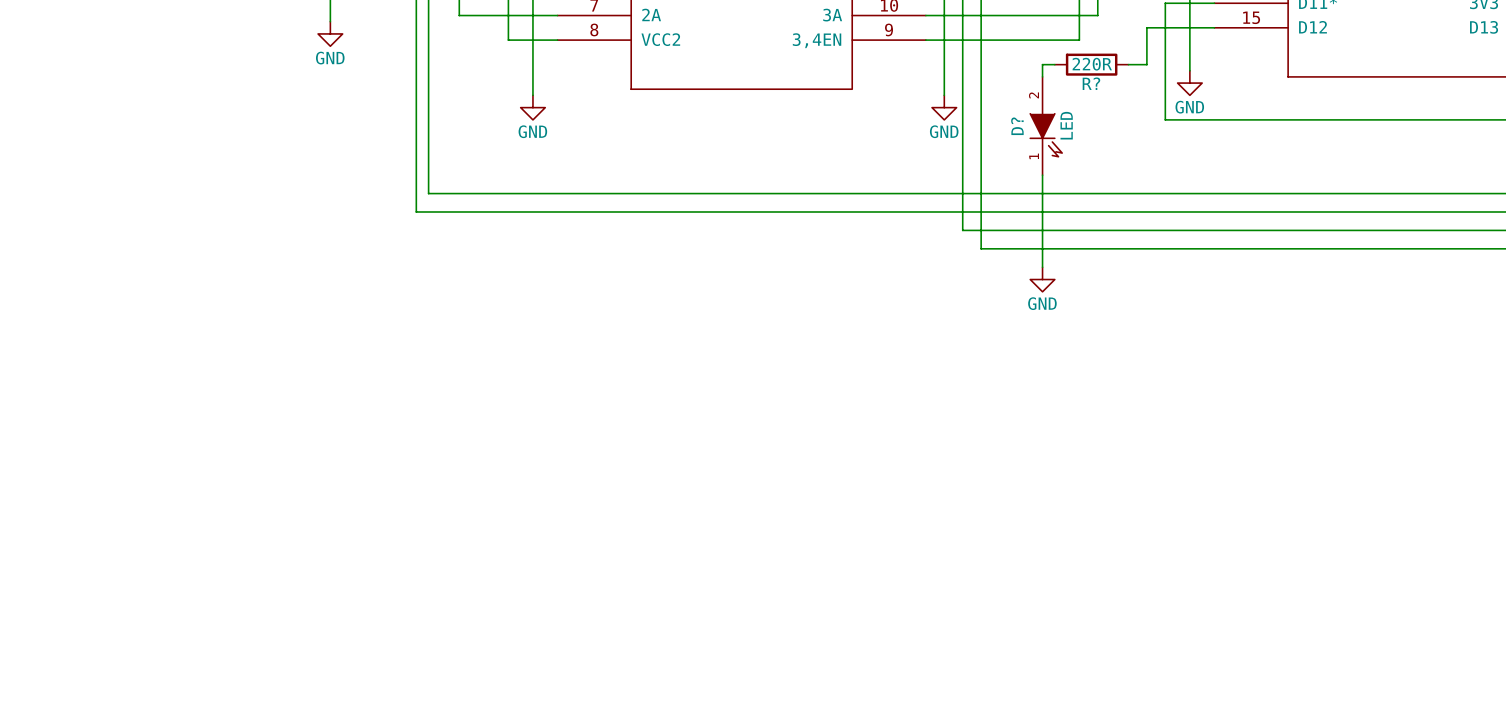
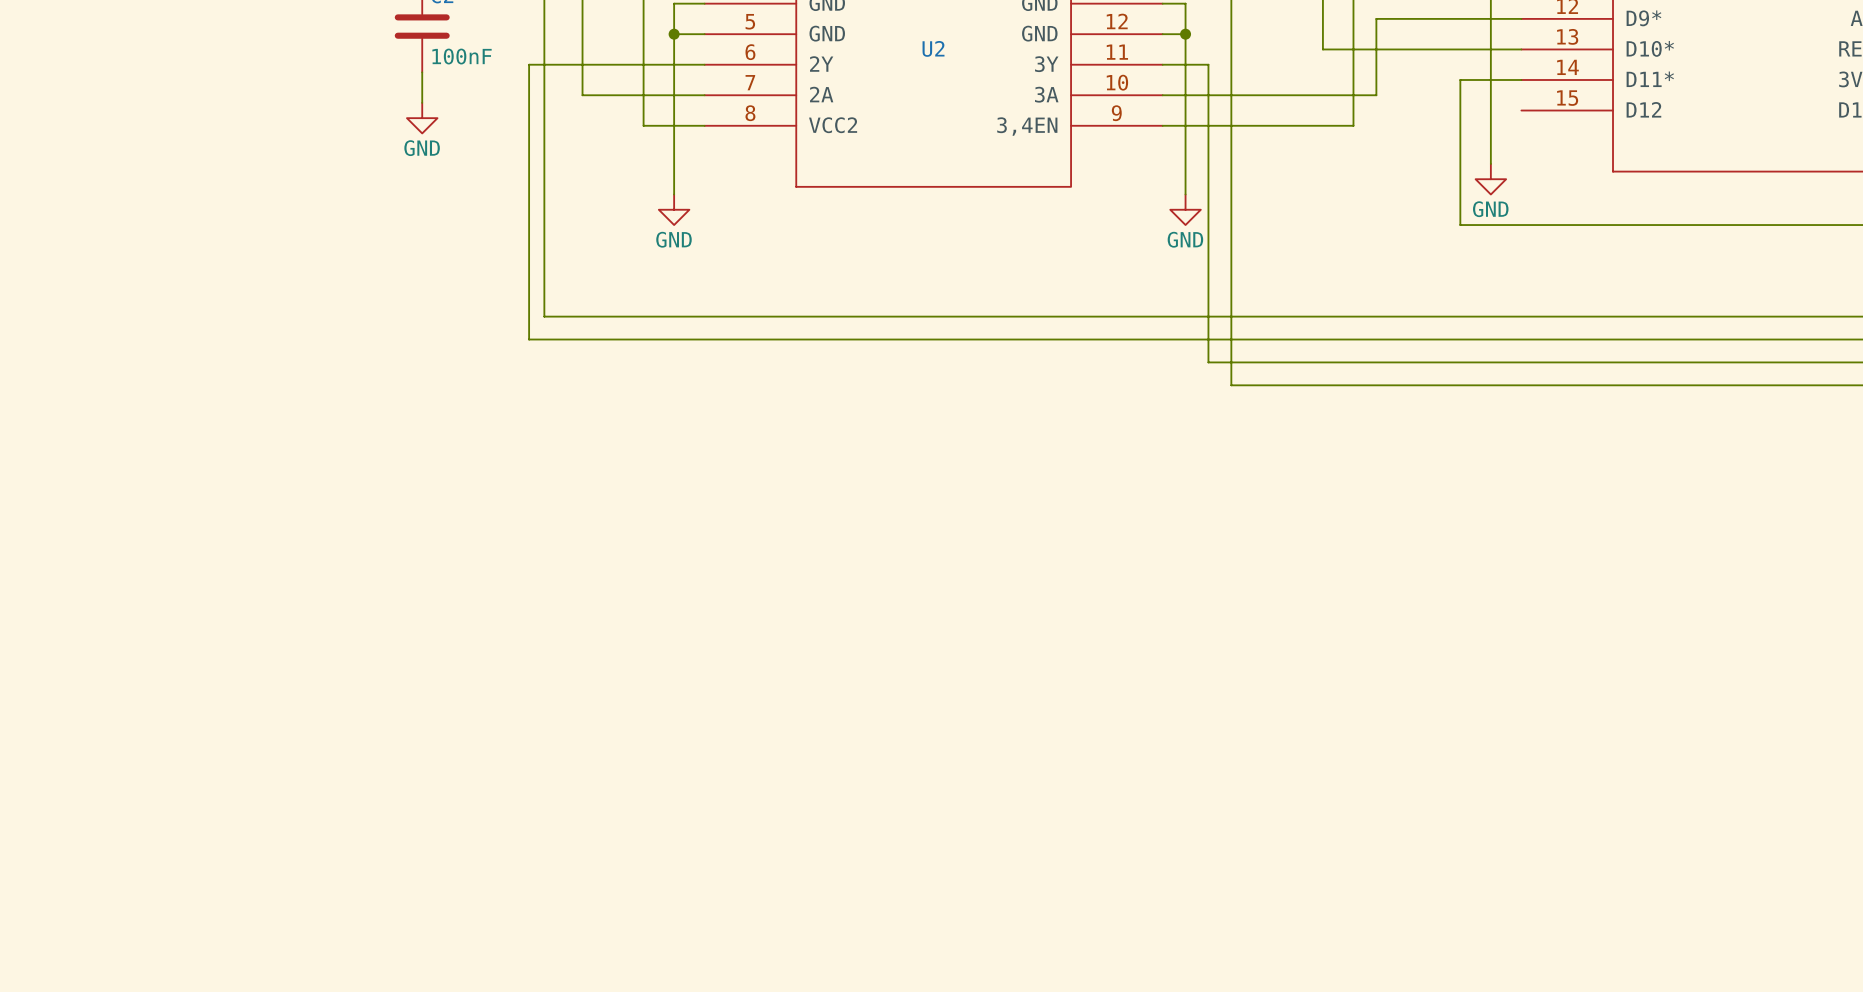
wire: (1214, 27) (1146, 27) (1146, 64) (1128, 64) -> none
wire: (1054, 64) (1042, 64) (1042, 76) -> none
R?: 220R (1091, 64) -> none
D?: LED (1046, 126) -> none
wire: (1042, 175) (1042, 267) -> none
power symbol: GND (1042, 279) -> none

